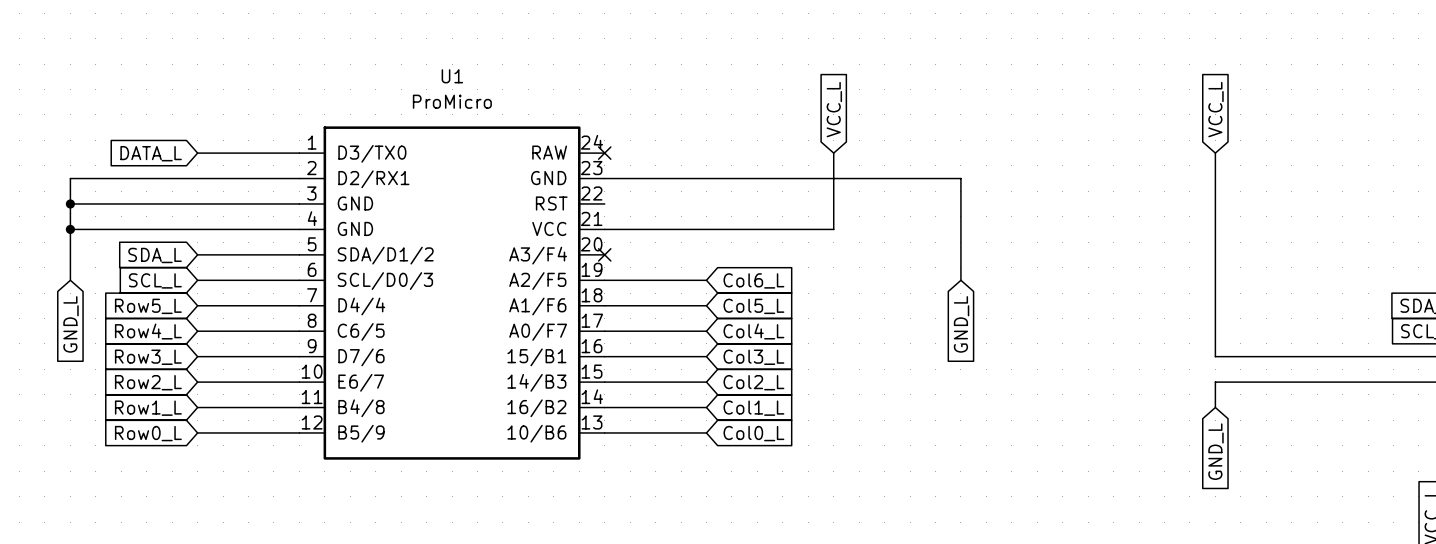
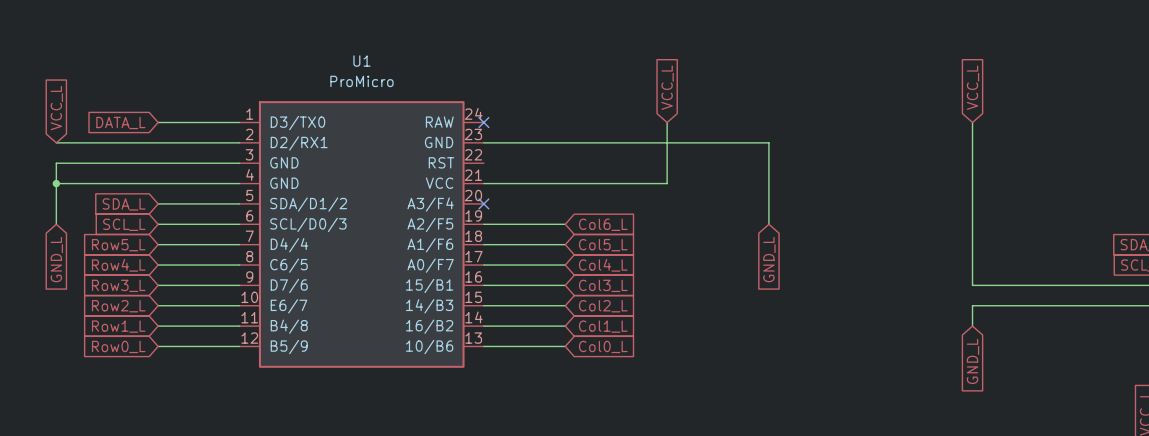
global label: none -> VCC_L (56, 108)
wire: (70, 178) (70, 203) -> none
junction: (70, 203) -> none

